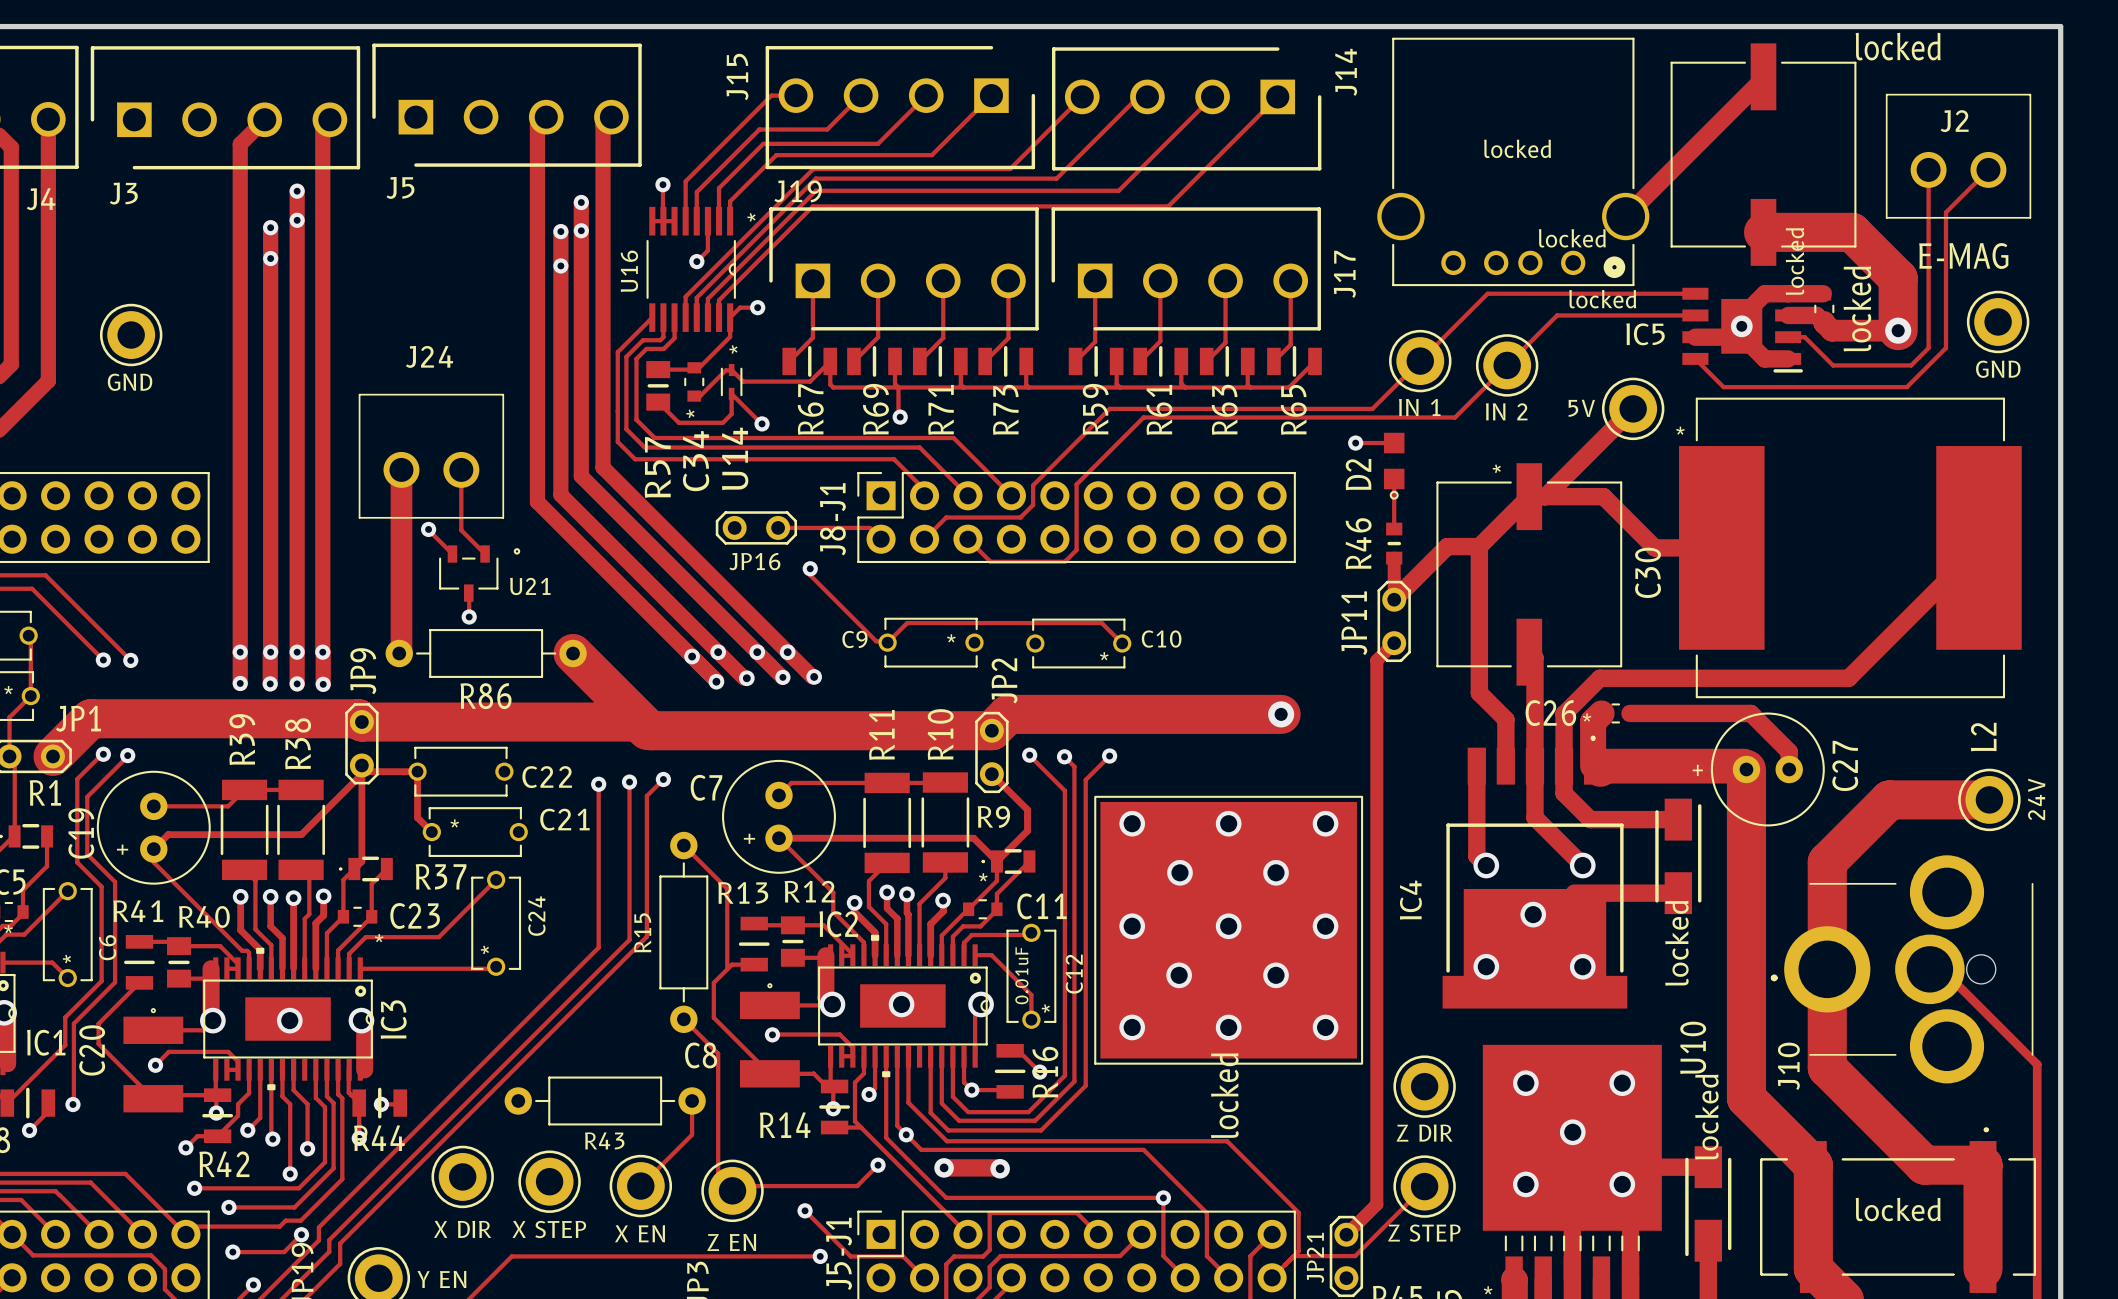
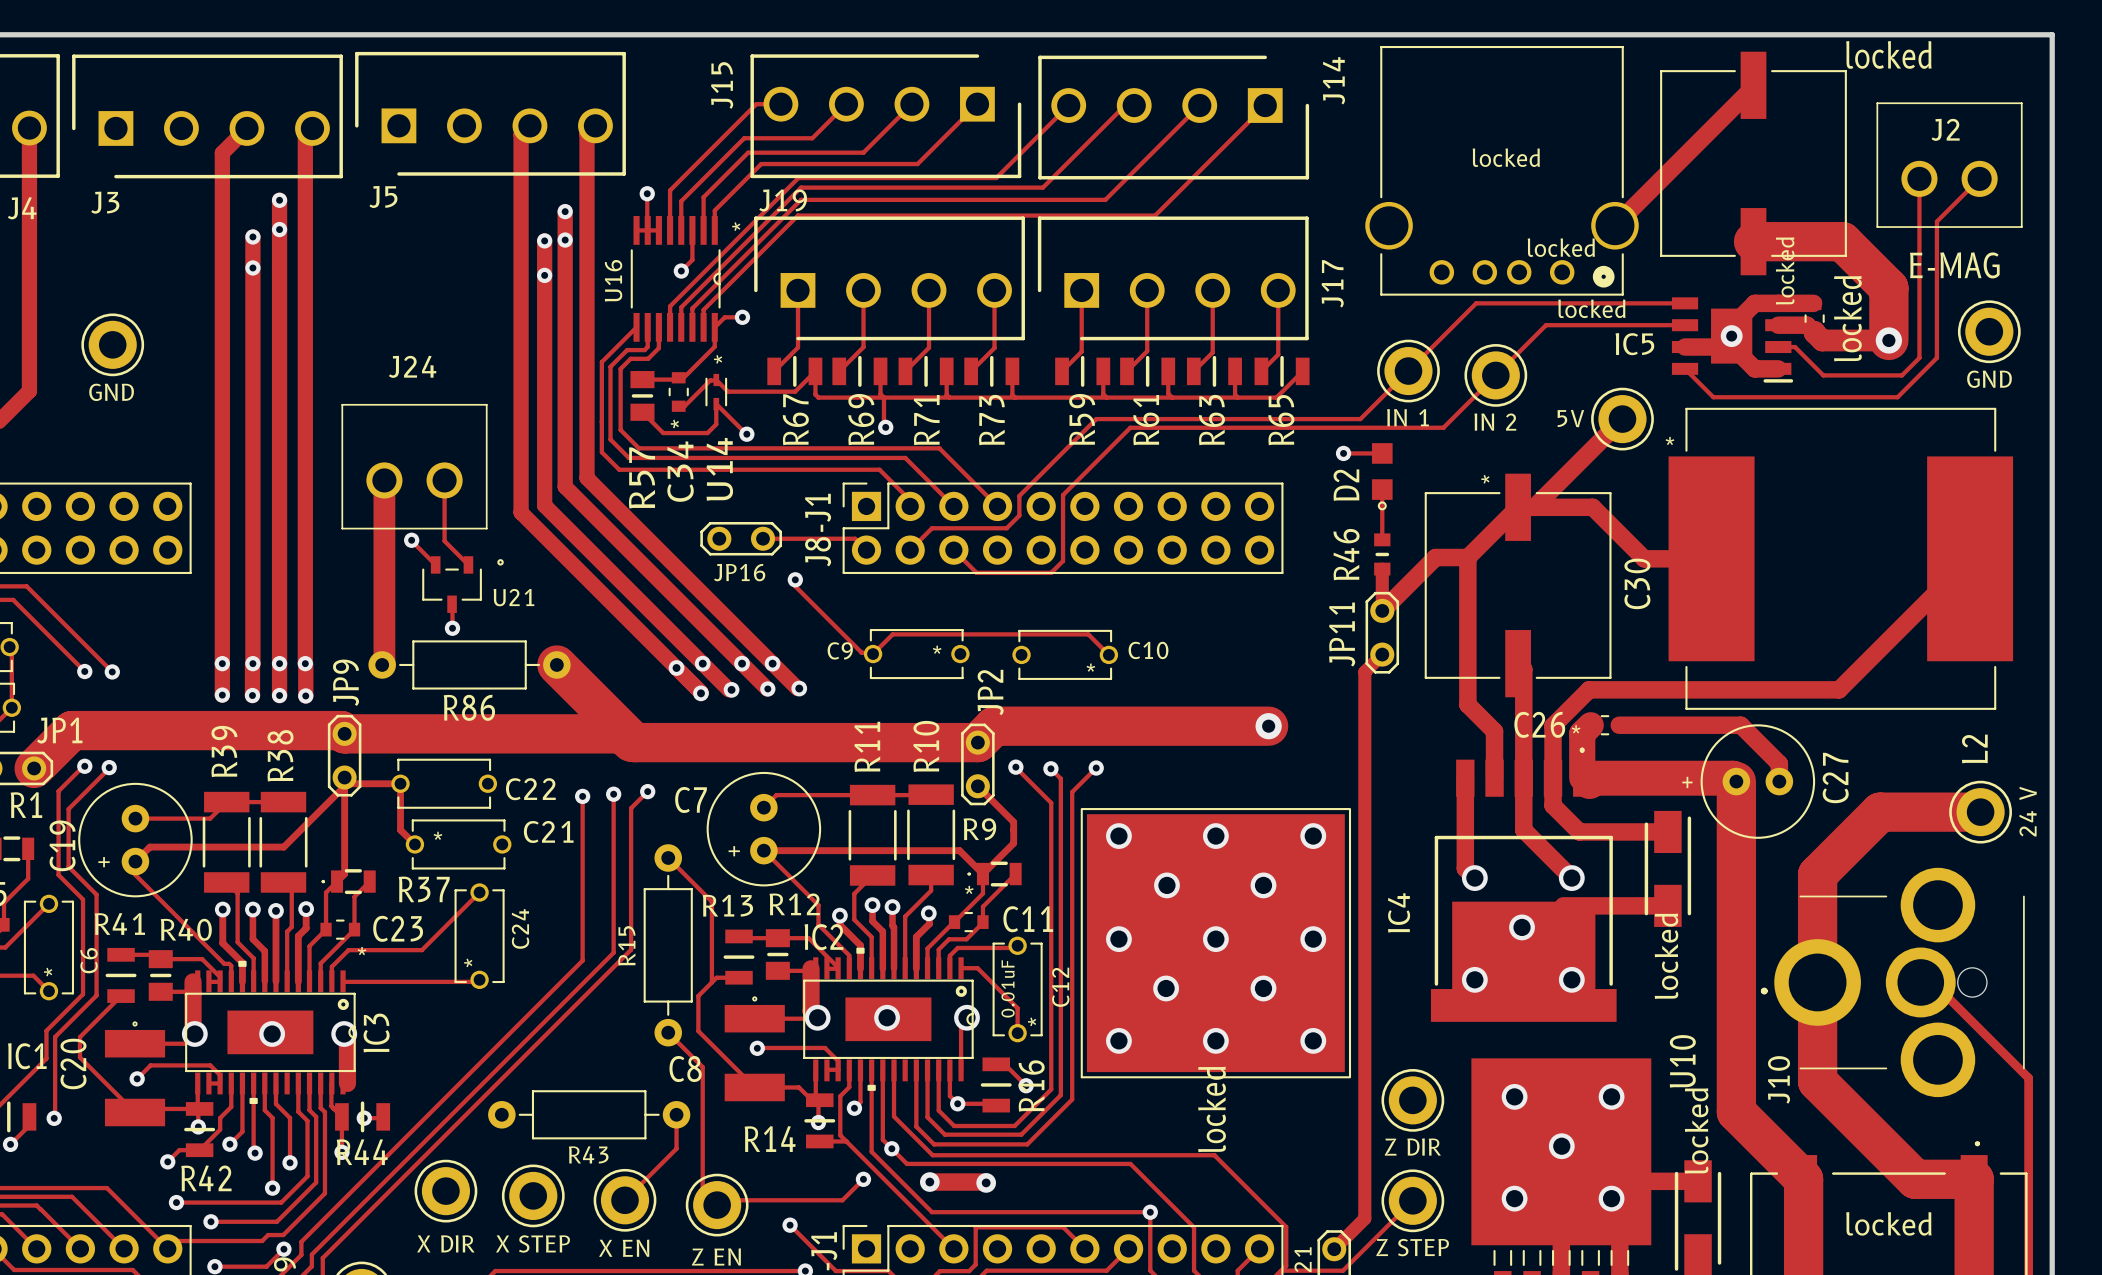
part value: 24V (2036, 799) -> 24 V (2028, 811)

